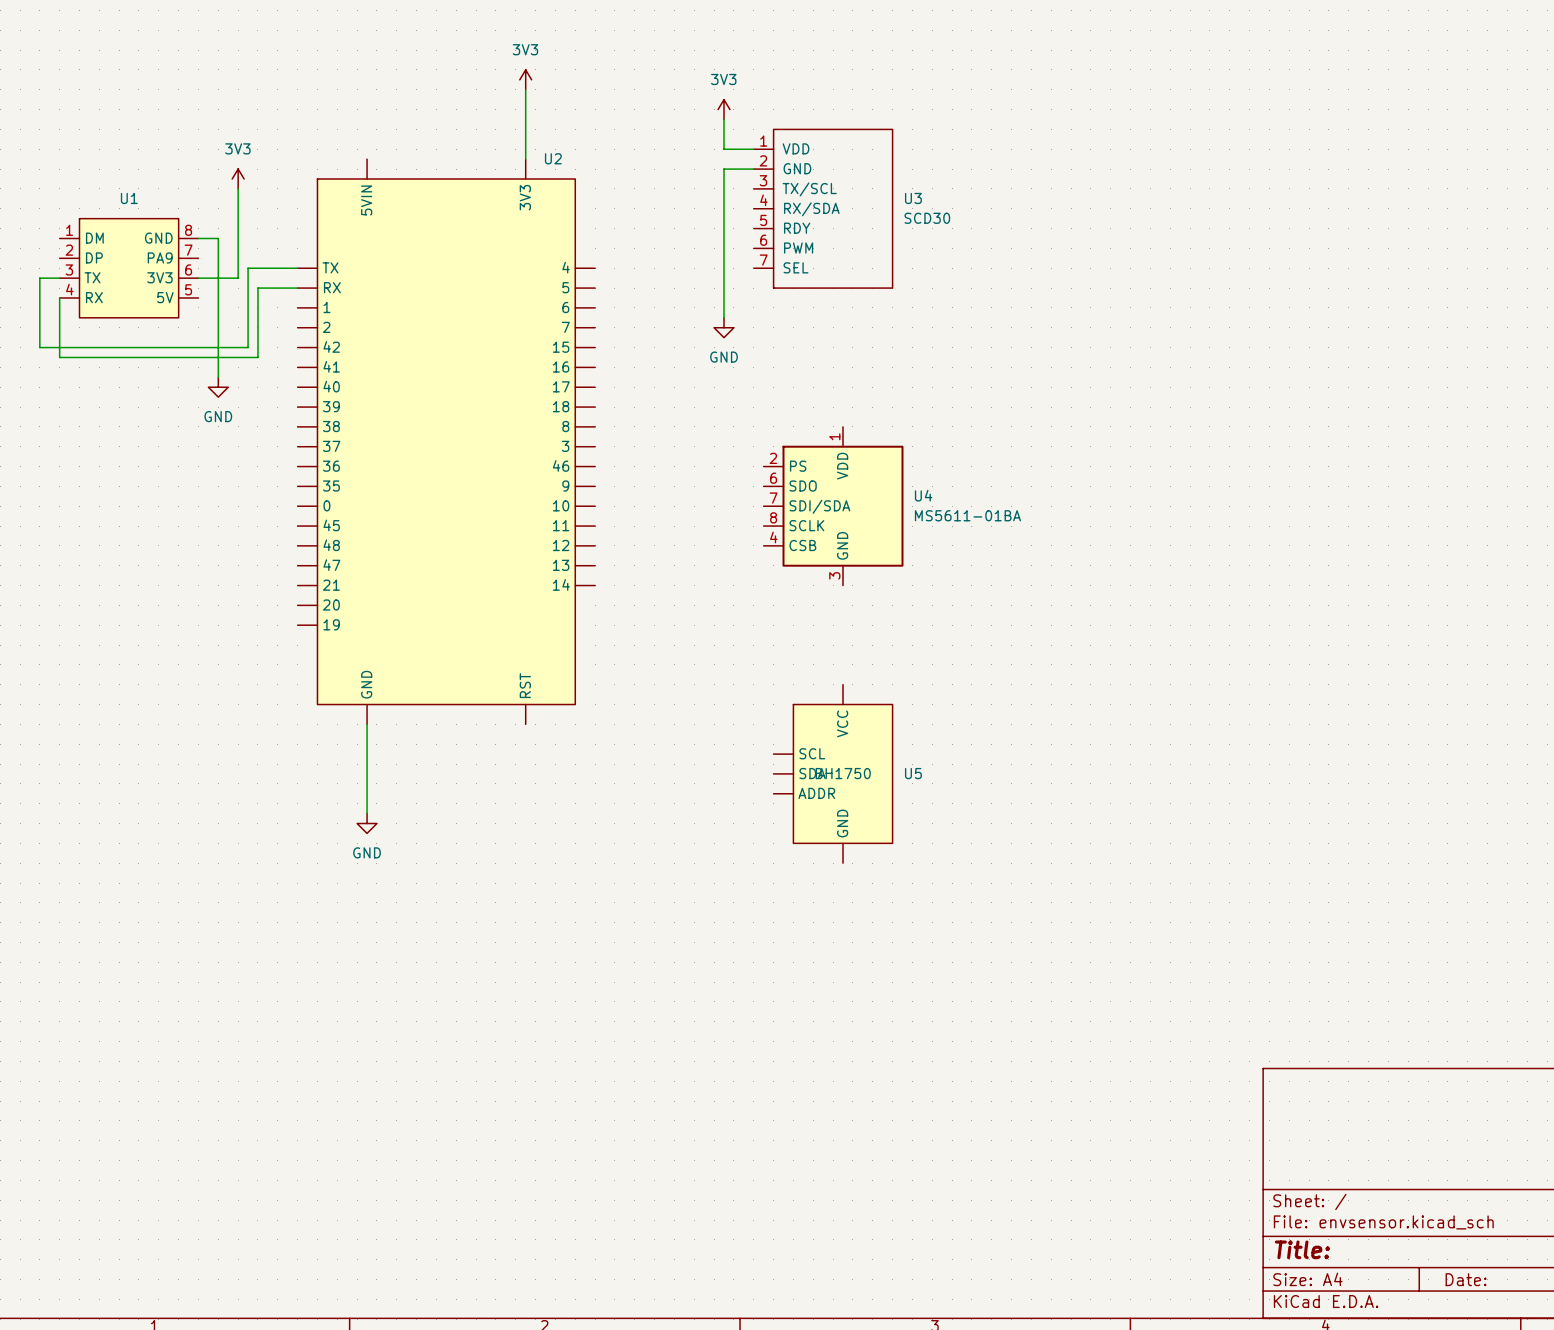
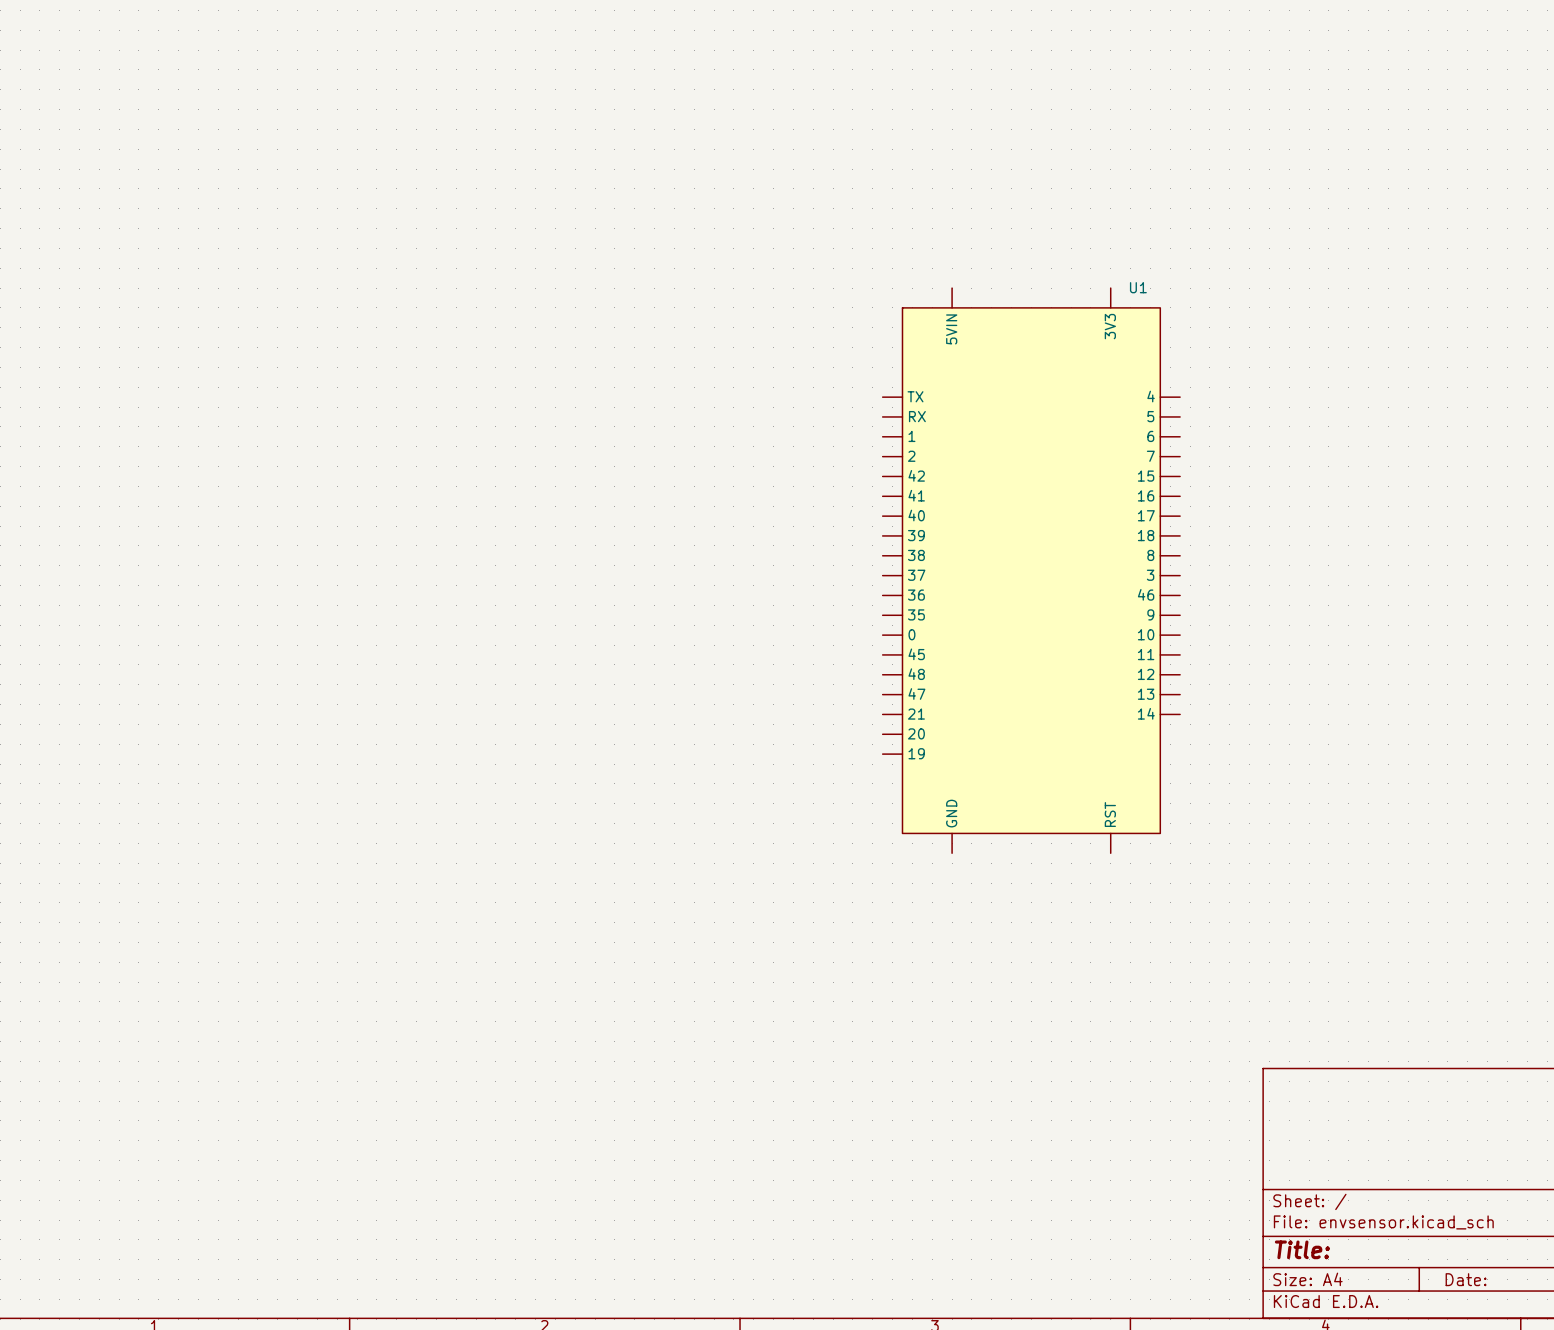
power symbol: 3V3 (525, 79) -> none
wire: (525, 89) (525, 159) -> none
power symbol: 3V3 (724, 109) -> none
wire: (724, 119) (724, 149) (753, 149) -> none
wire: (753, 169) (724, 169) (724, 317) -> none
power symbol: 3V3 (238, 179) -> none
wire: (238, 188) (238, 278) (198, 278) -> none
U1 name position: U1 (129, 198) -> U1 (1138, 287)
U3: SCD30 (823, 208) -> none
U1 symbol: [59, 218, 199, 318] -> [882, 288, 1181, 854]
wire: (198, 238) (218, 238) (218, 377) -> none
wire: (297, 268) (248, 268) (248, 347) (39, 347) (39, 278) (59, 278) -> none
wire: (297, 288) (257, 288) (257, 357) (59, 357) (59, 297) -> none
power symbol: GND (724, 327) -> none
power symbol: GND (218, 387) -> none
U2: (446, 441) -> none
U4: MS5611-01BA (833, 506) -> none
wire: (367, 724) (367, 813) -> none
U5: BH1750 (833, 773) -> none
power symbol: GND (367, 823) -> none

